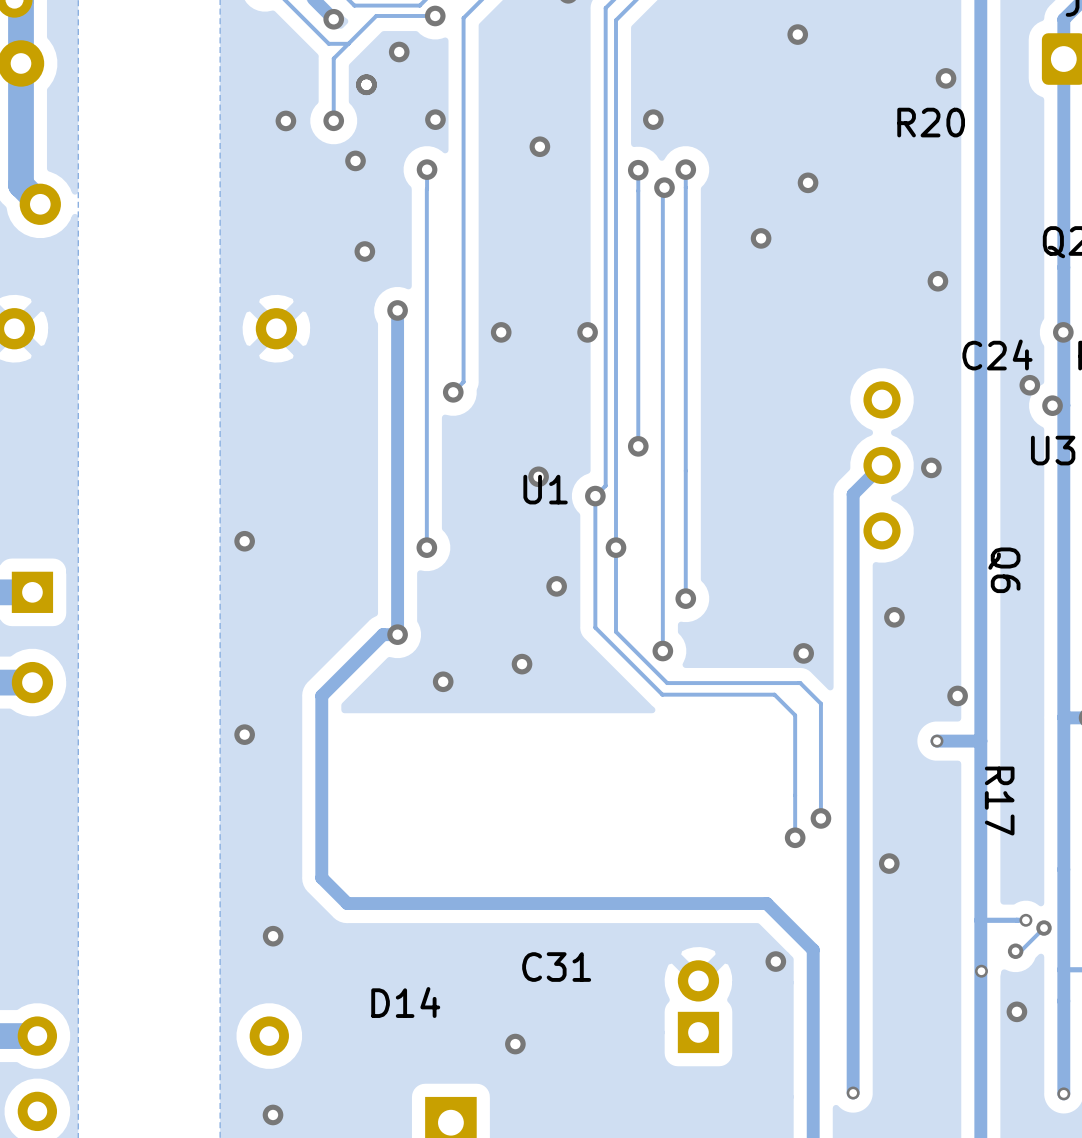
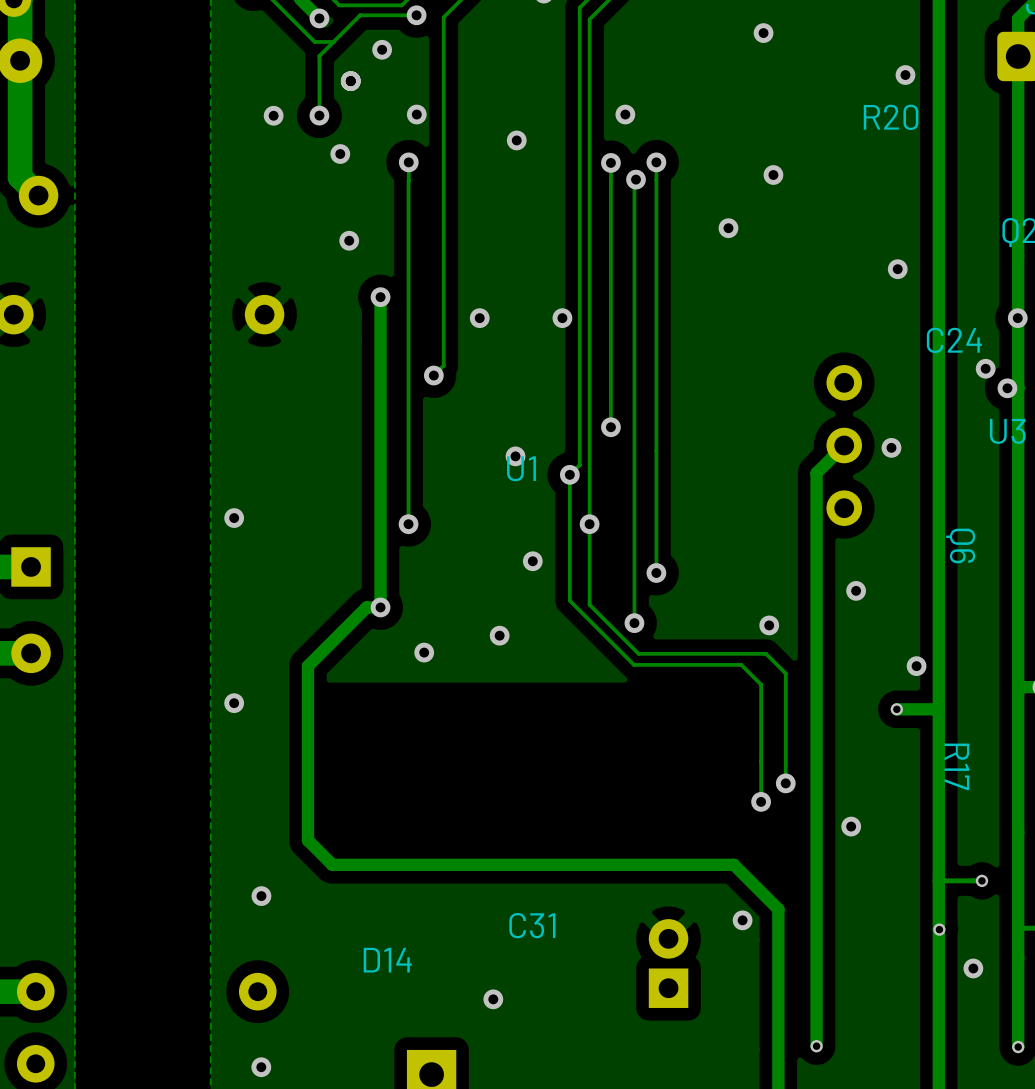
track: (1043, 928) (1020, 951) (1015, 951) -> none
via: (1043, 928) -> none
via: (1015, 951) -> none

